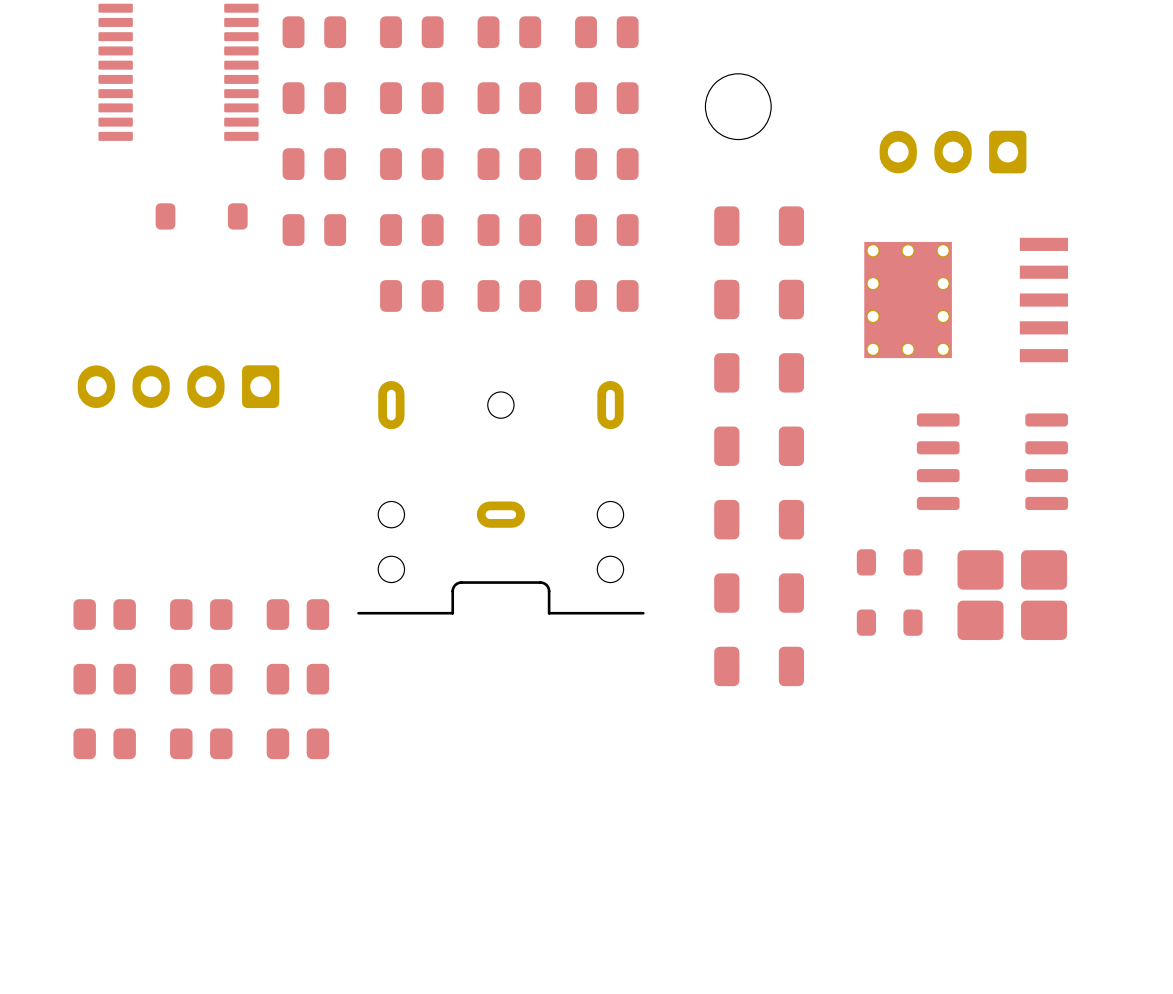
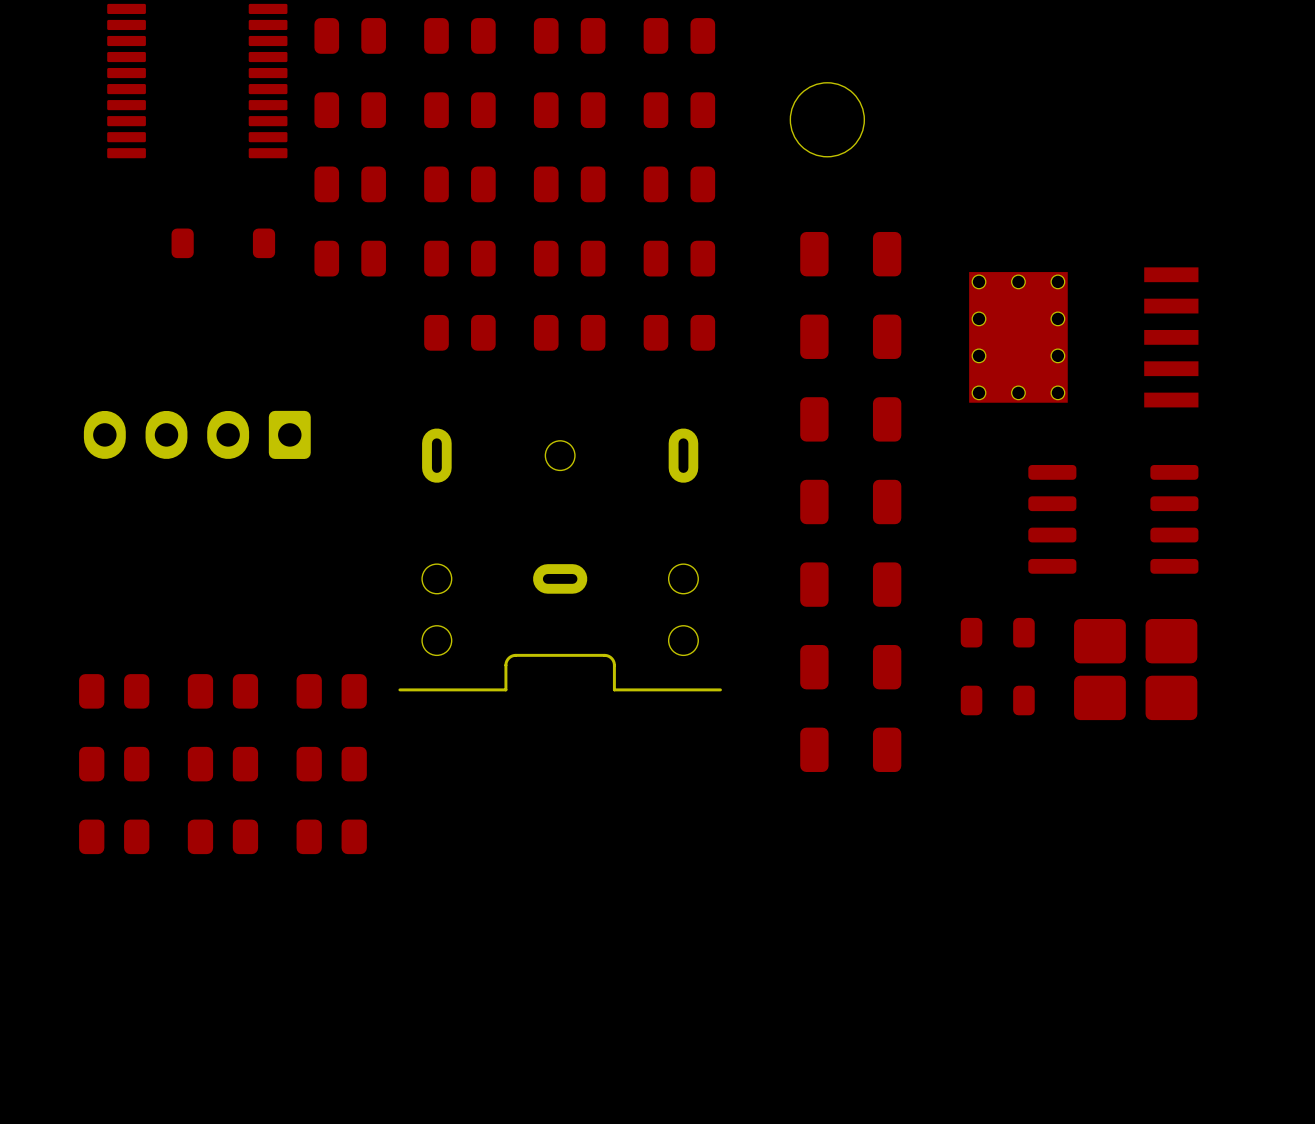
part: (953, 152) -> none

